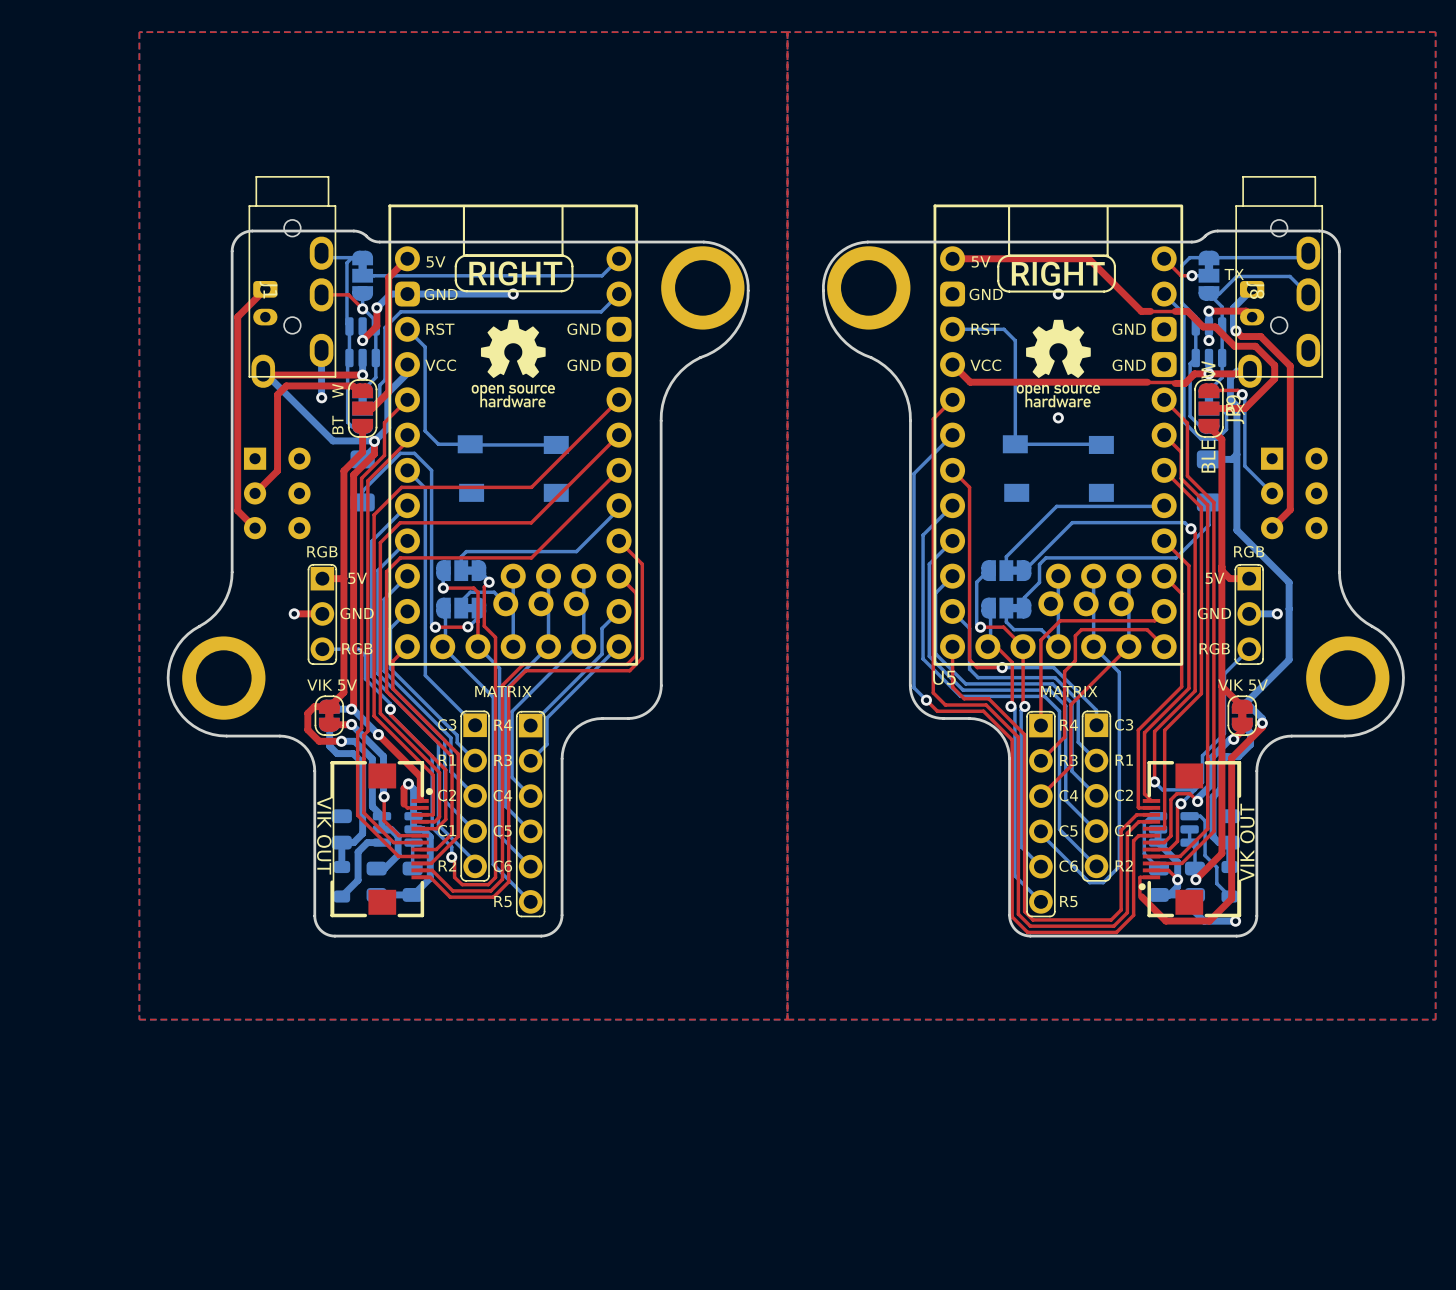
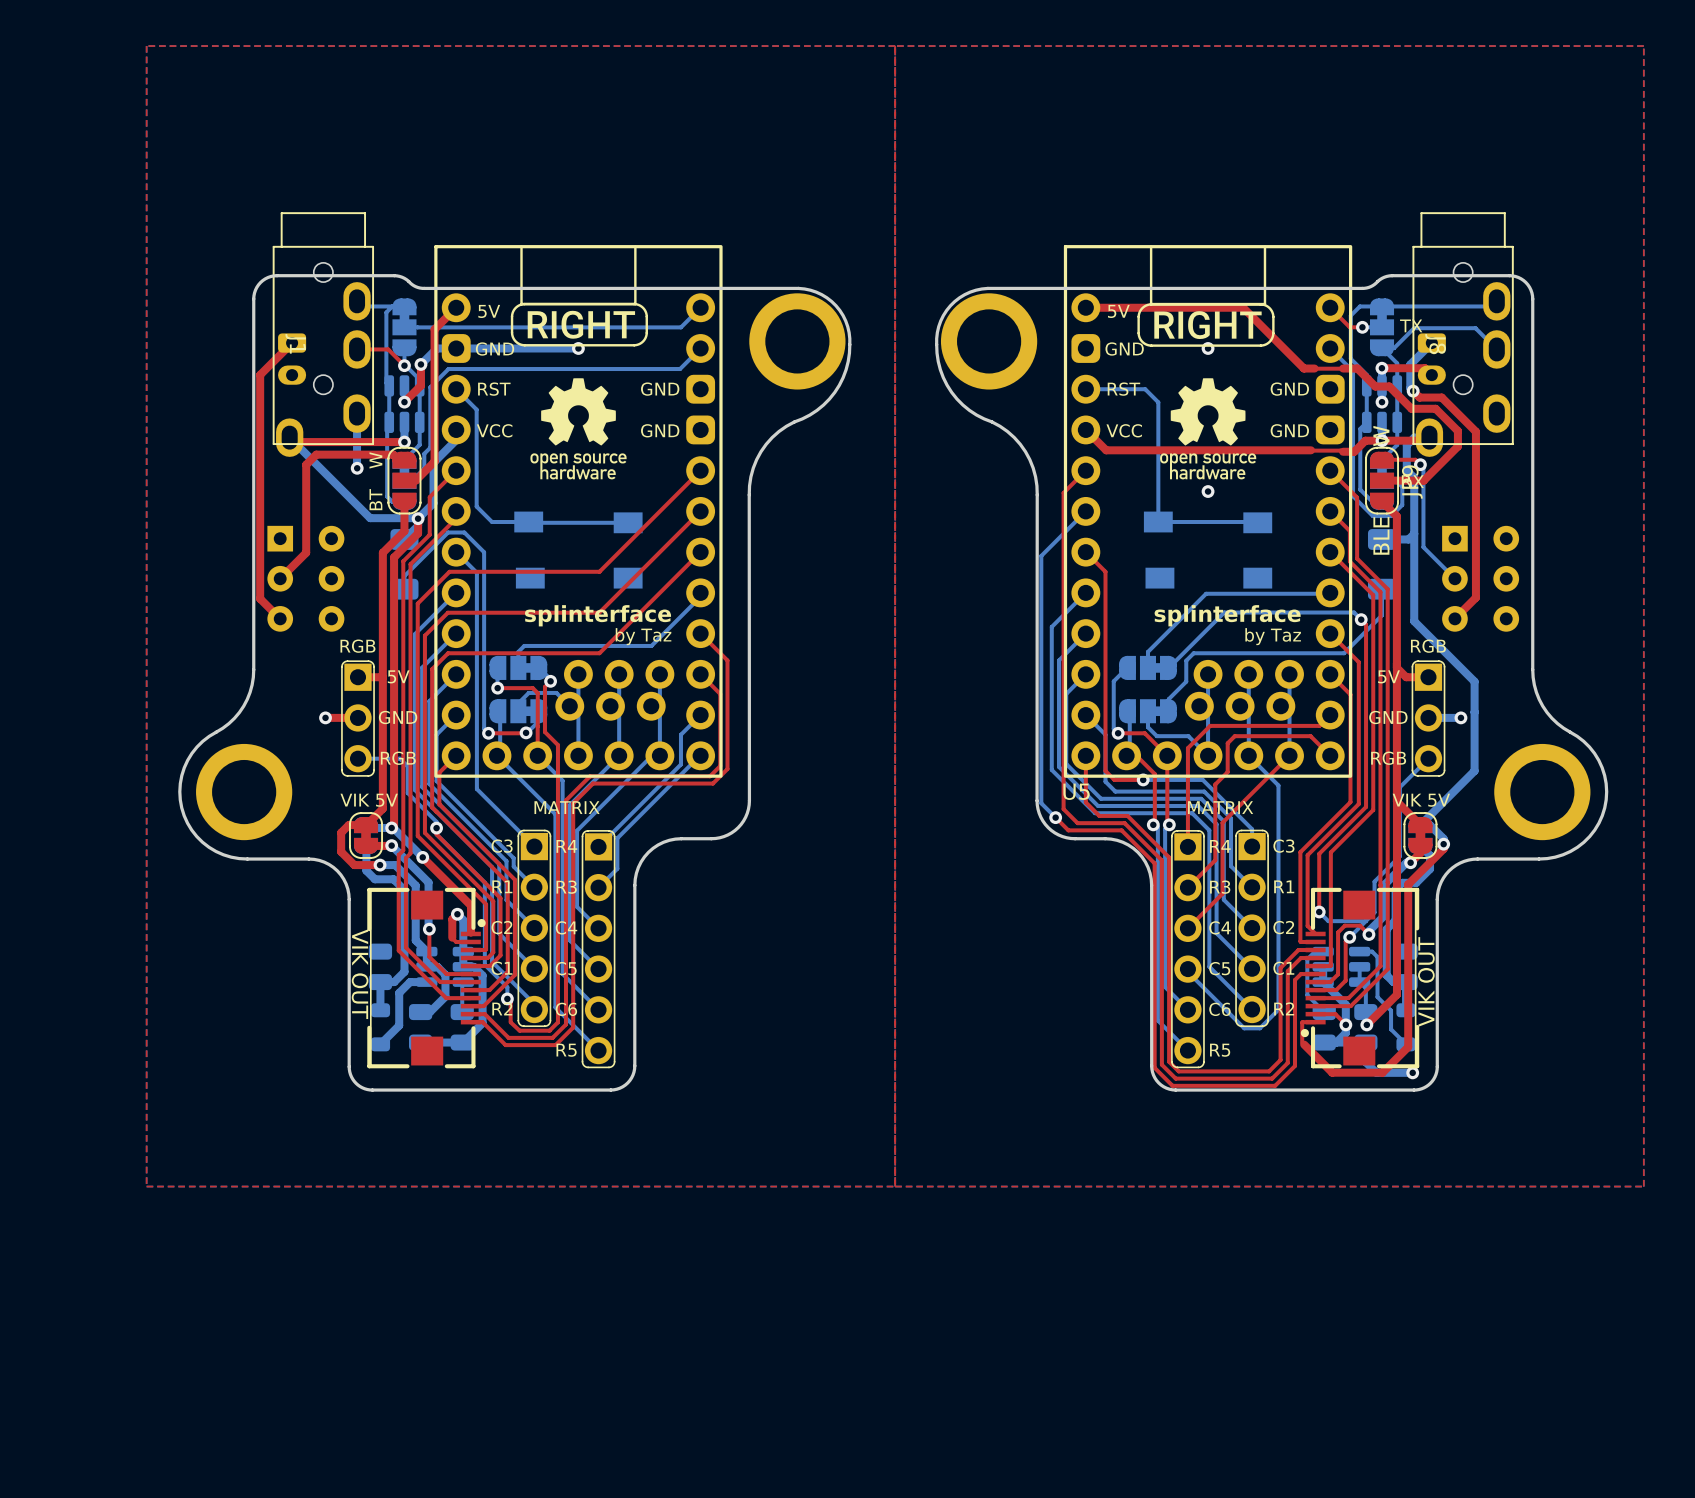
text: none -> splinterface (598, 615)
text: none -> splinterface (1227, 615)
text: none -> by Taz (643, 636)
text: none -> by Taz (1273, 636)

